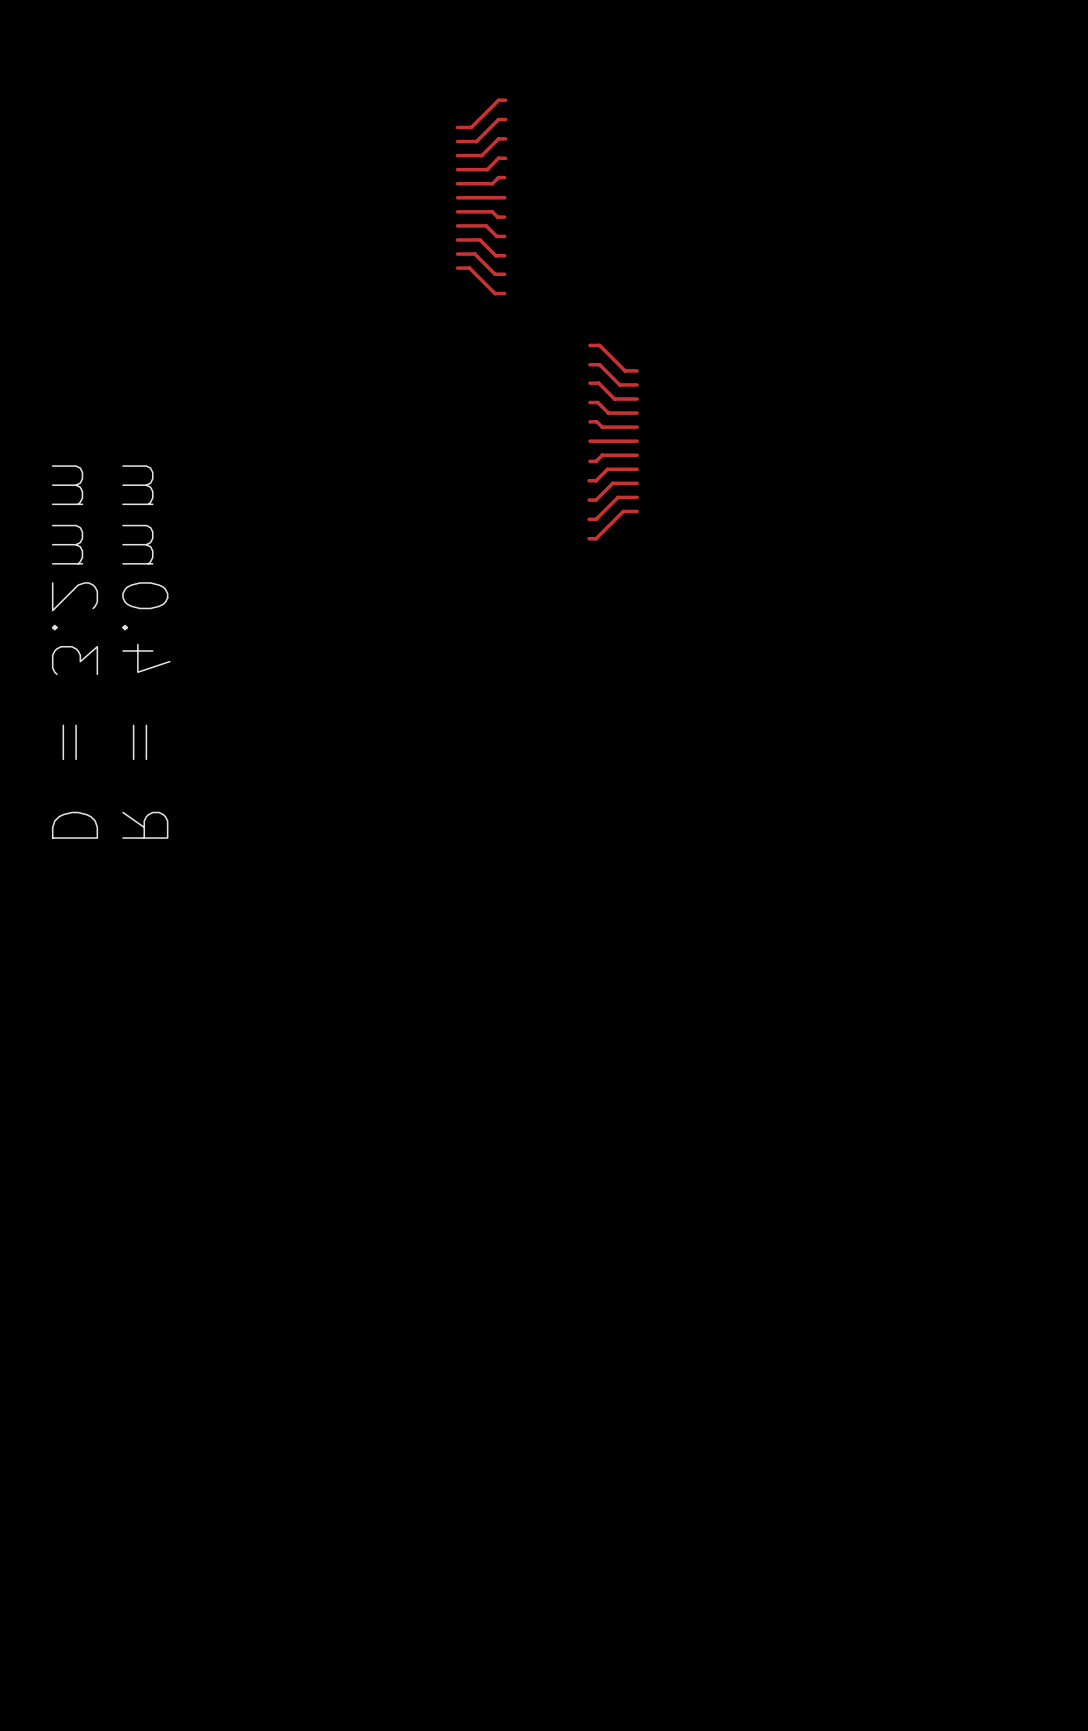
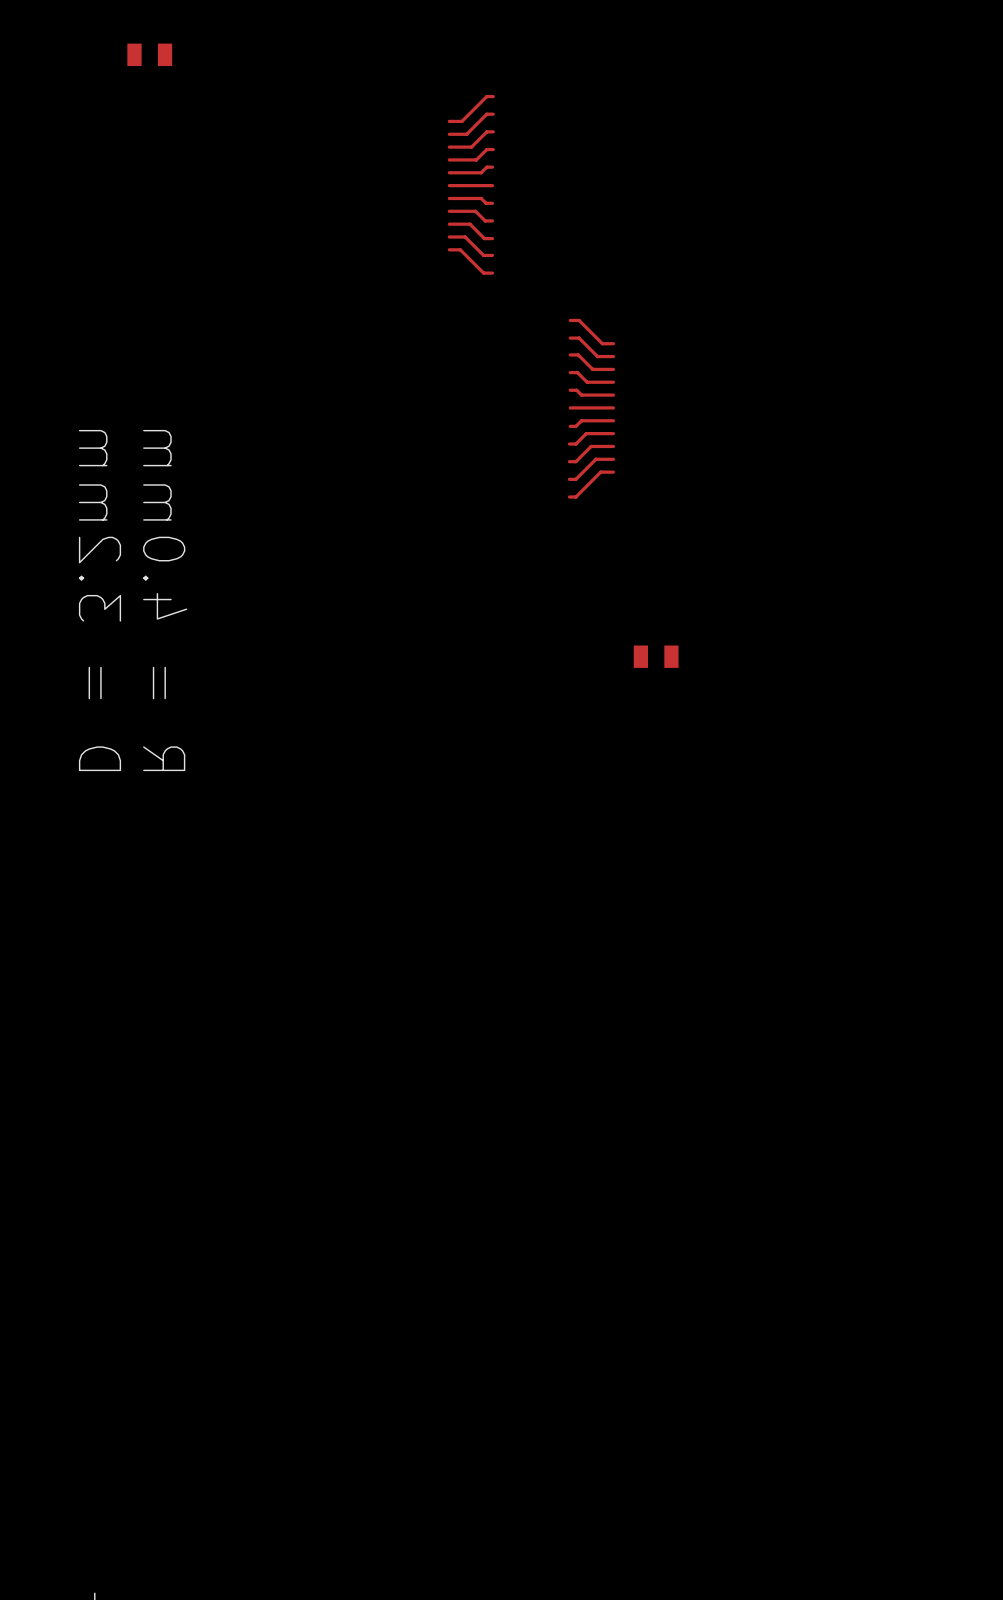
part: none -> (149, 54)
part: none -> (656, 656)

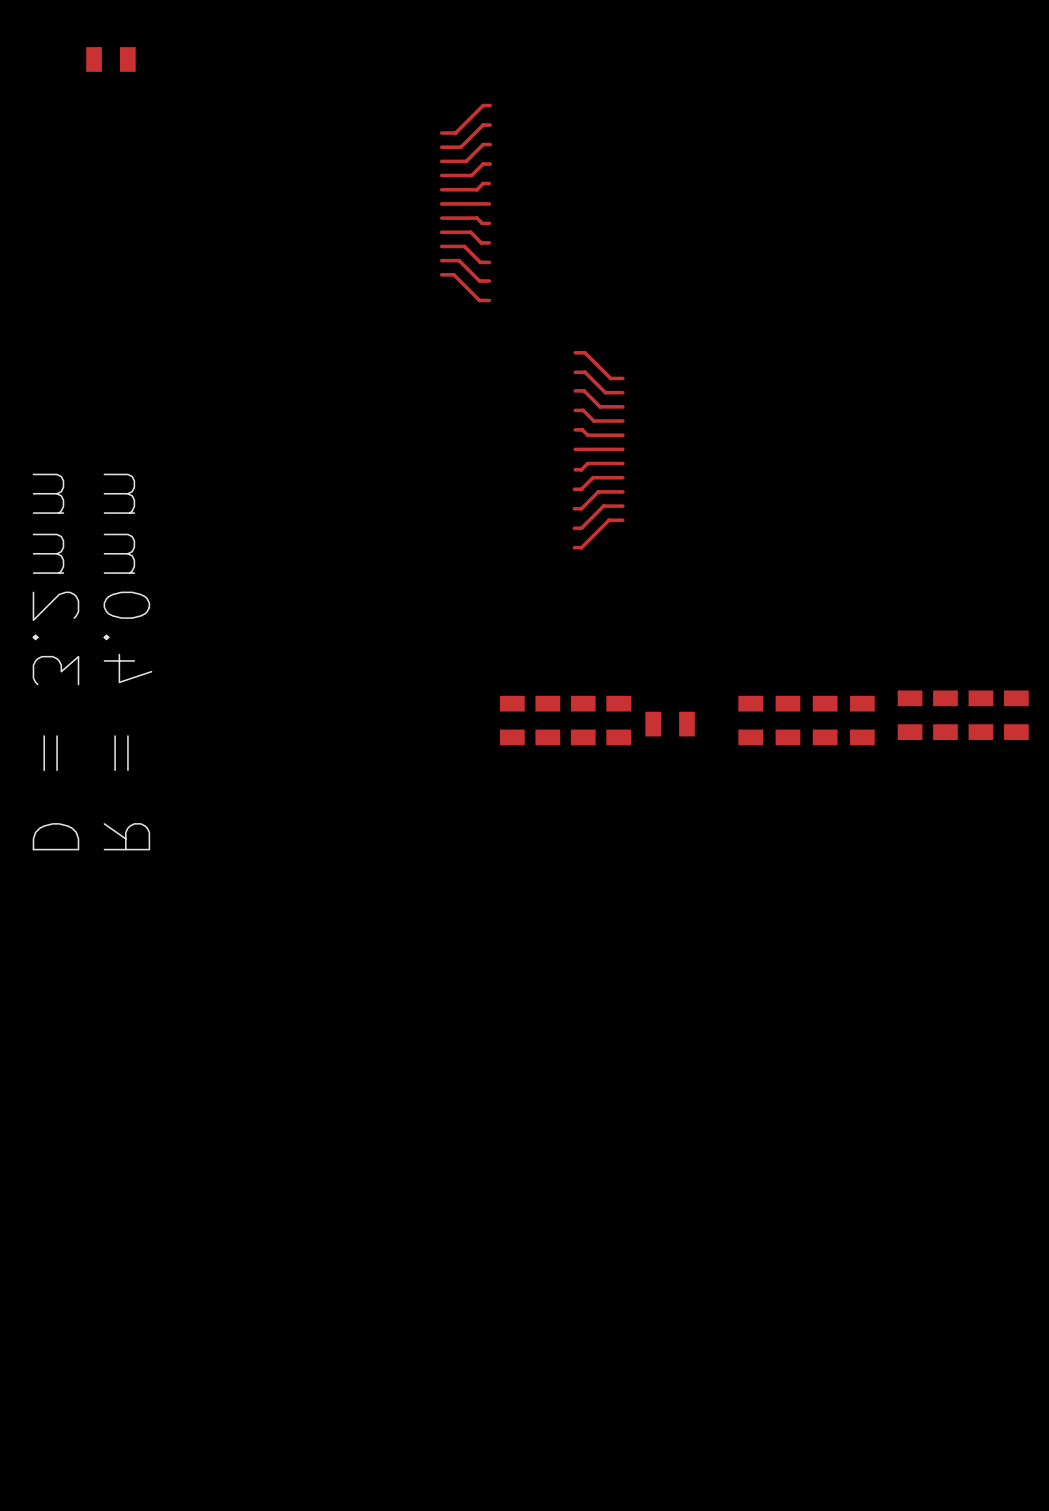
part: none -> (910, 715)
part: none -> (945, 715)
part: none -> (980, 715)
part: none -> (1016, 715)
part: none -> (512, 720)
part: none -> (547, 720)
part: none -> (583, 720)
part: none -> (618, 720)
part: none -> (750, 720)
part: none -> (787, 720)
part: none -> (825, 720)
part: none -> (862, 720)

